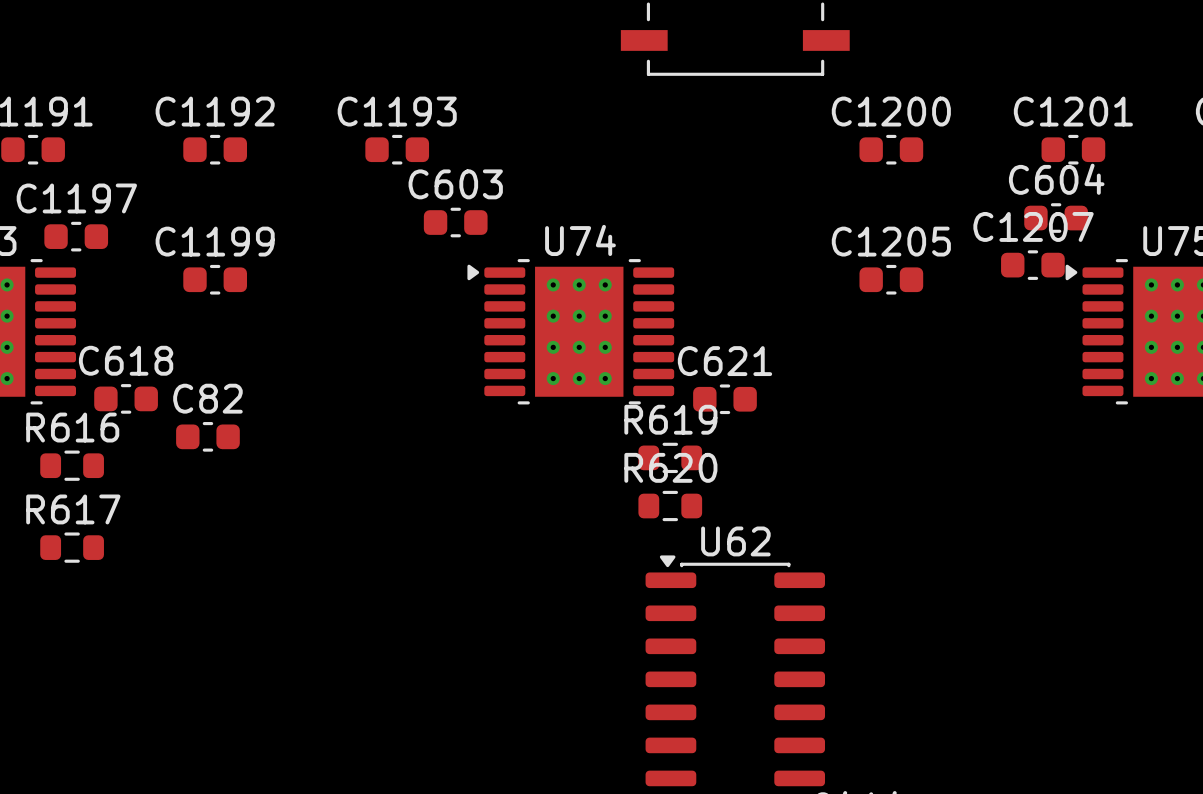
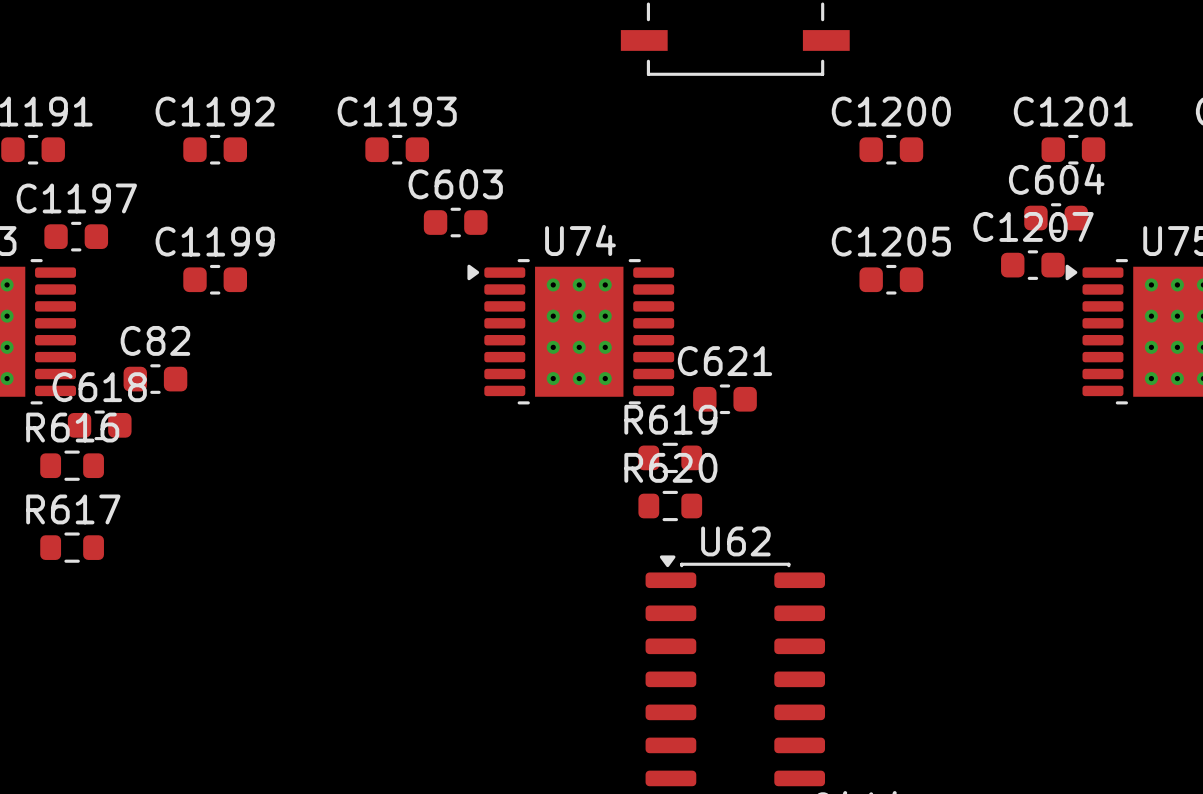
C618 position: (126, 398) -> (99, 425)
C82 position: (207, 436) -> (155, 379)

